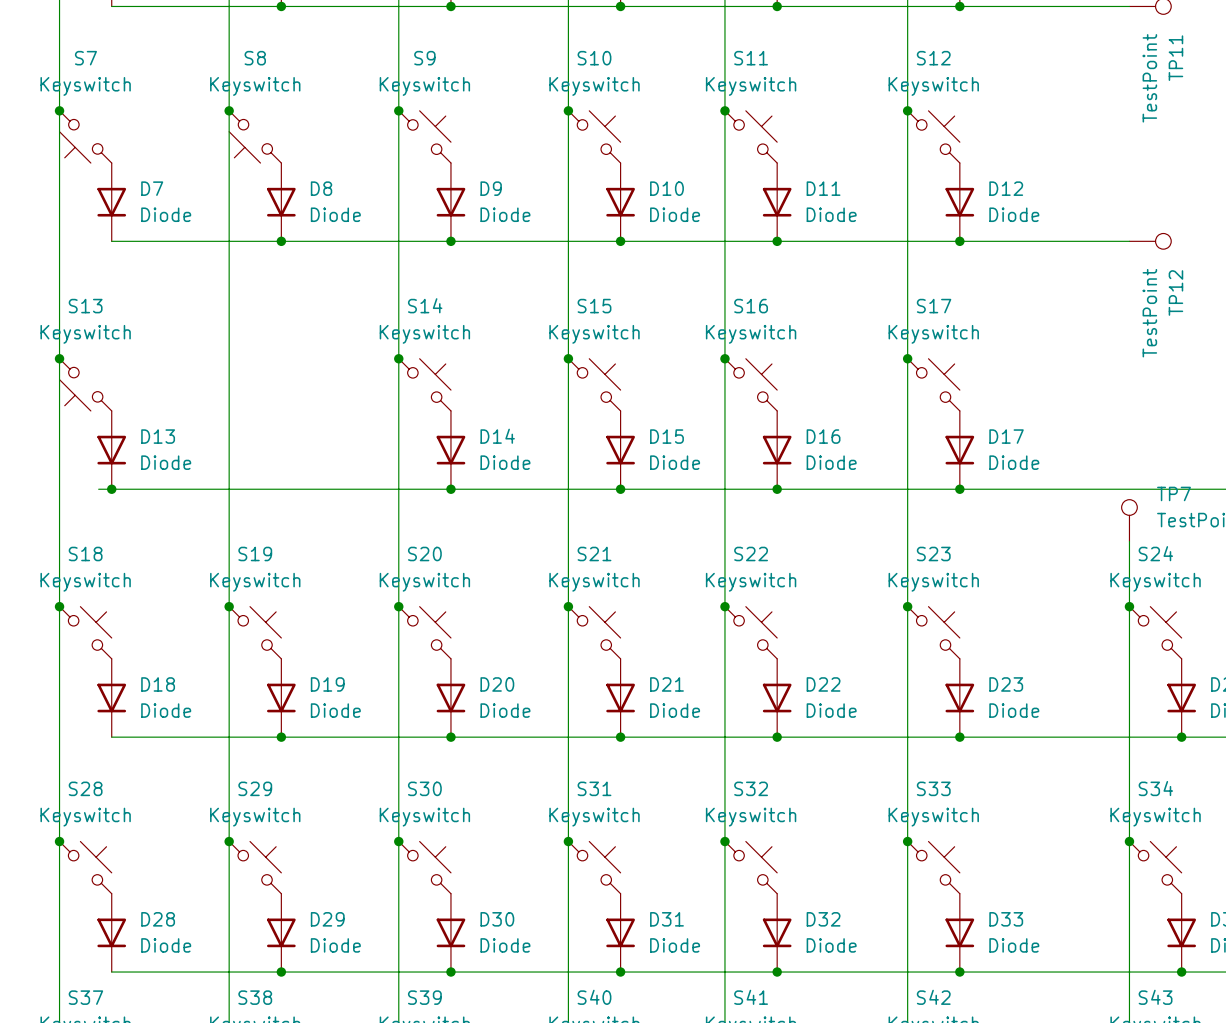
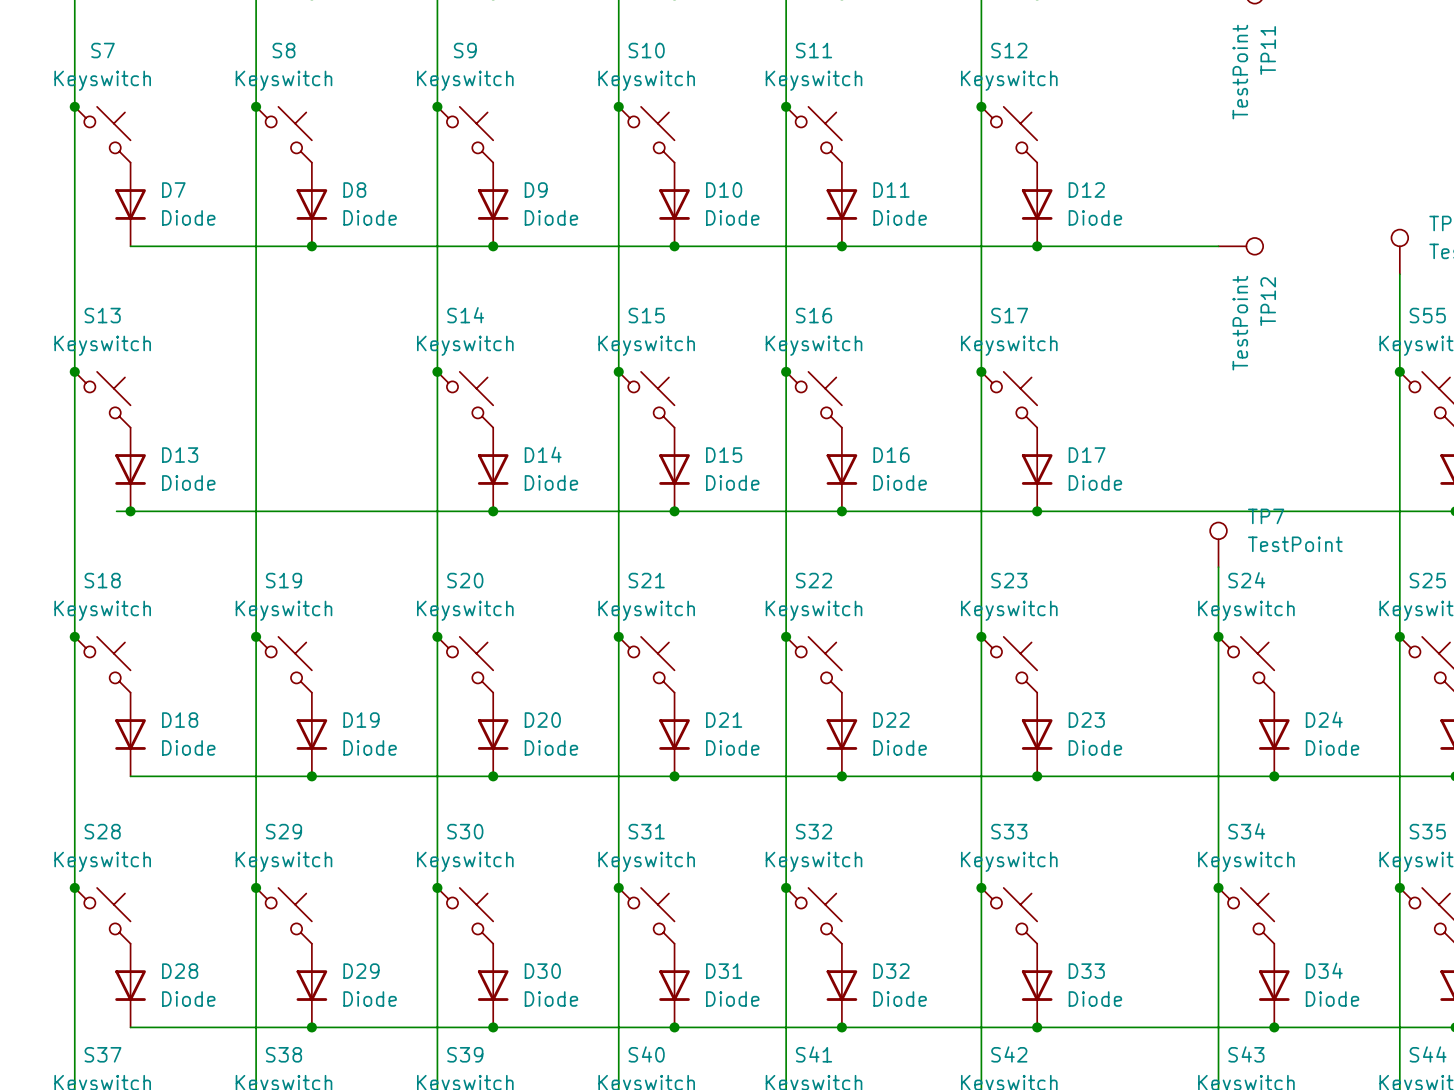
S7 rotation: 0° (85, 136) -> 180° (102, 134)
S8 rotation: 0° (255, 136) -> 180° (283, 134)
S13 rotation: 0° (85, 384) -> 180° (102, 399)

